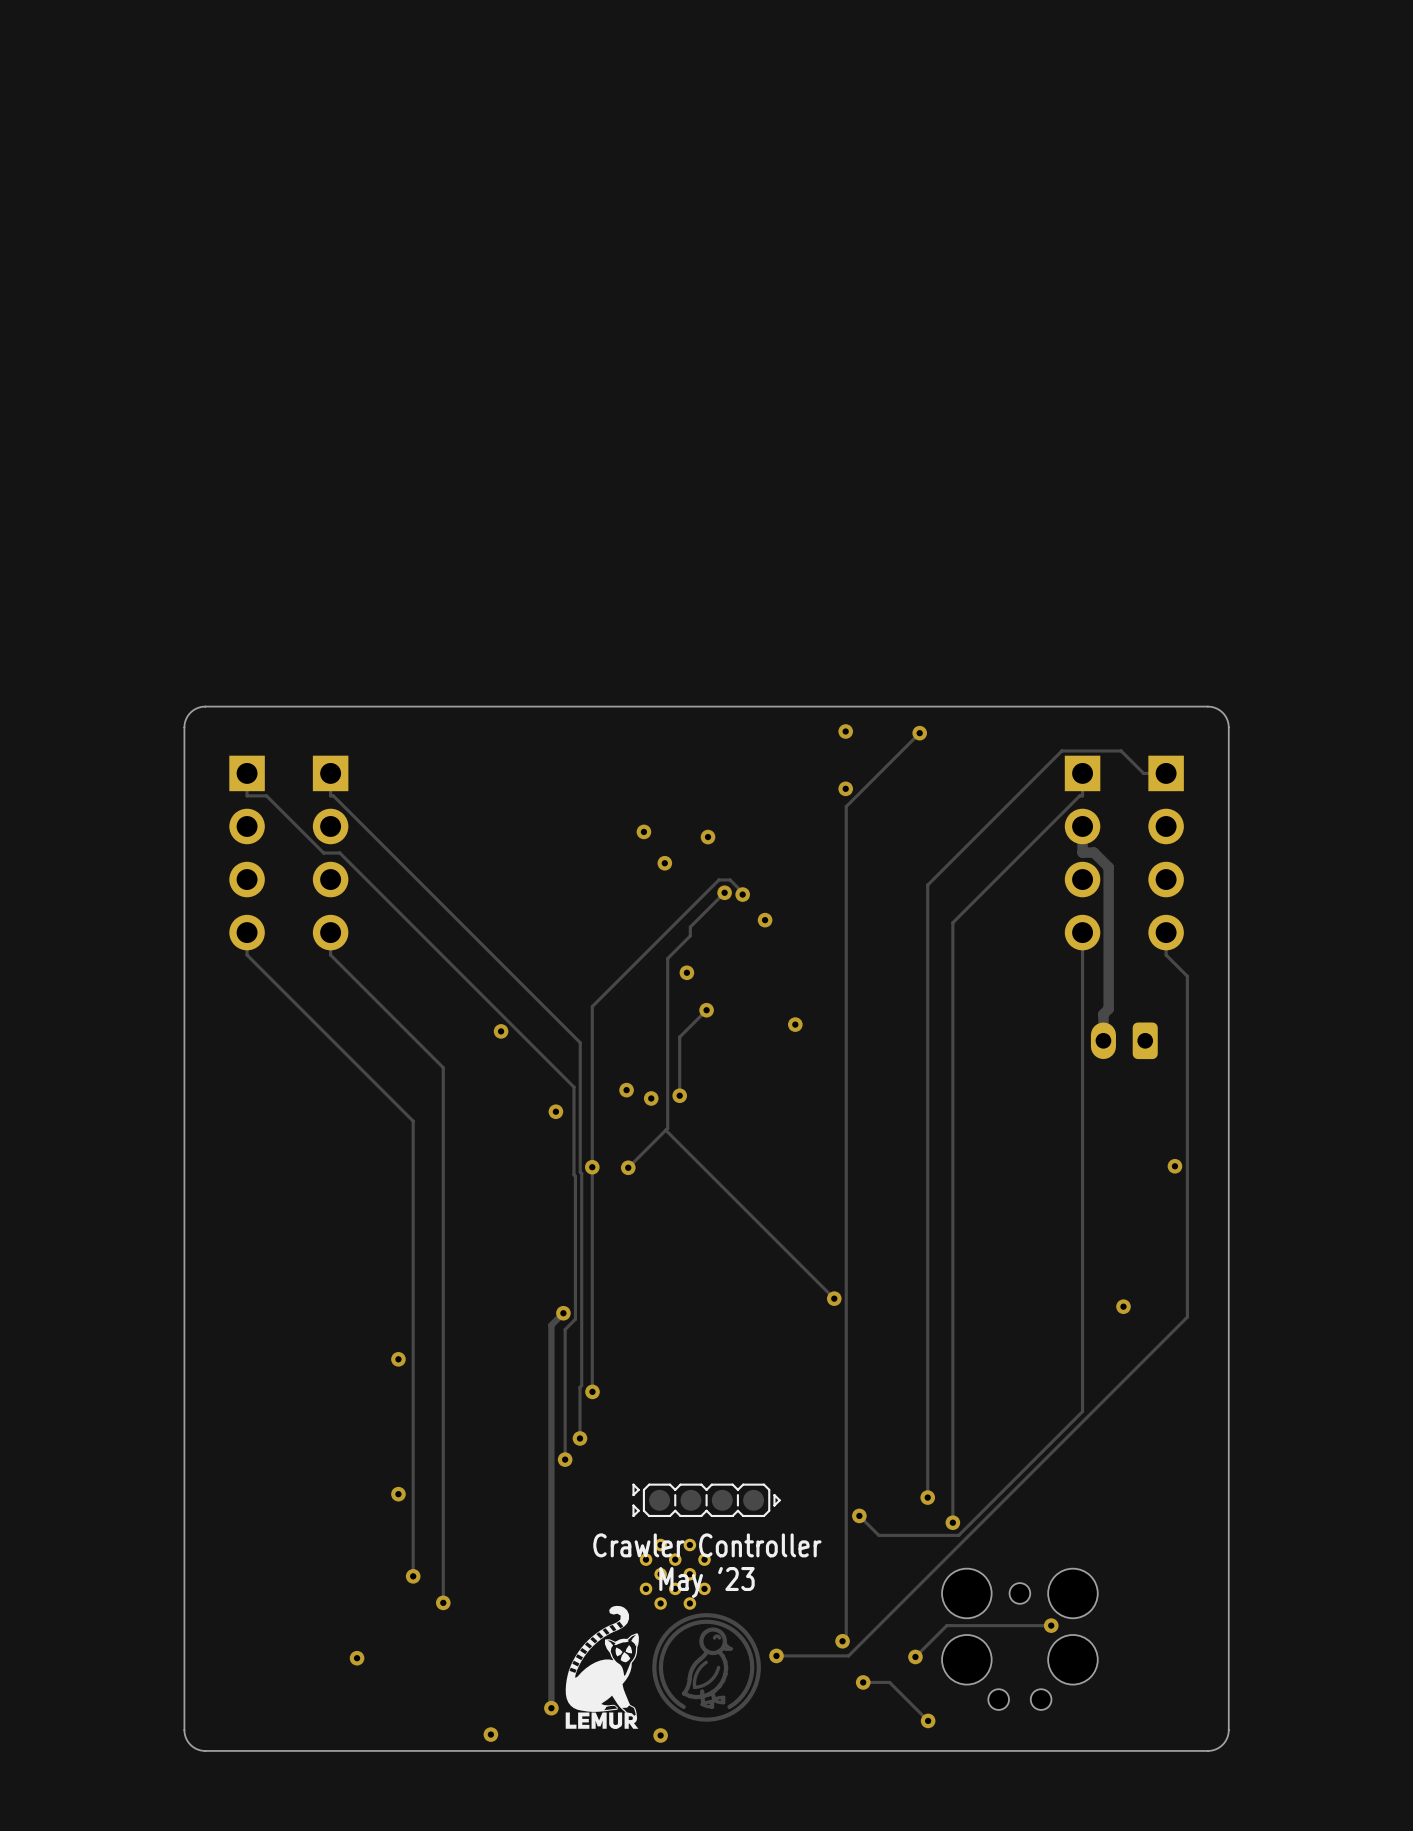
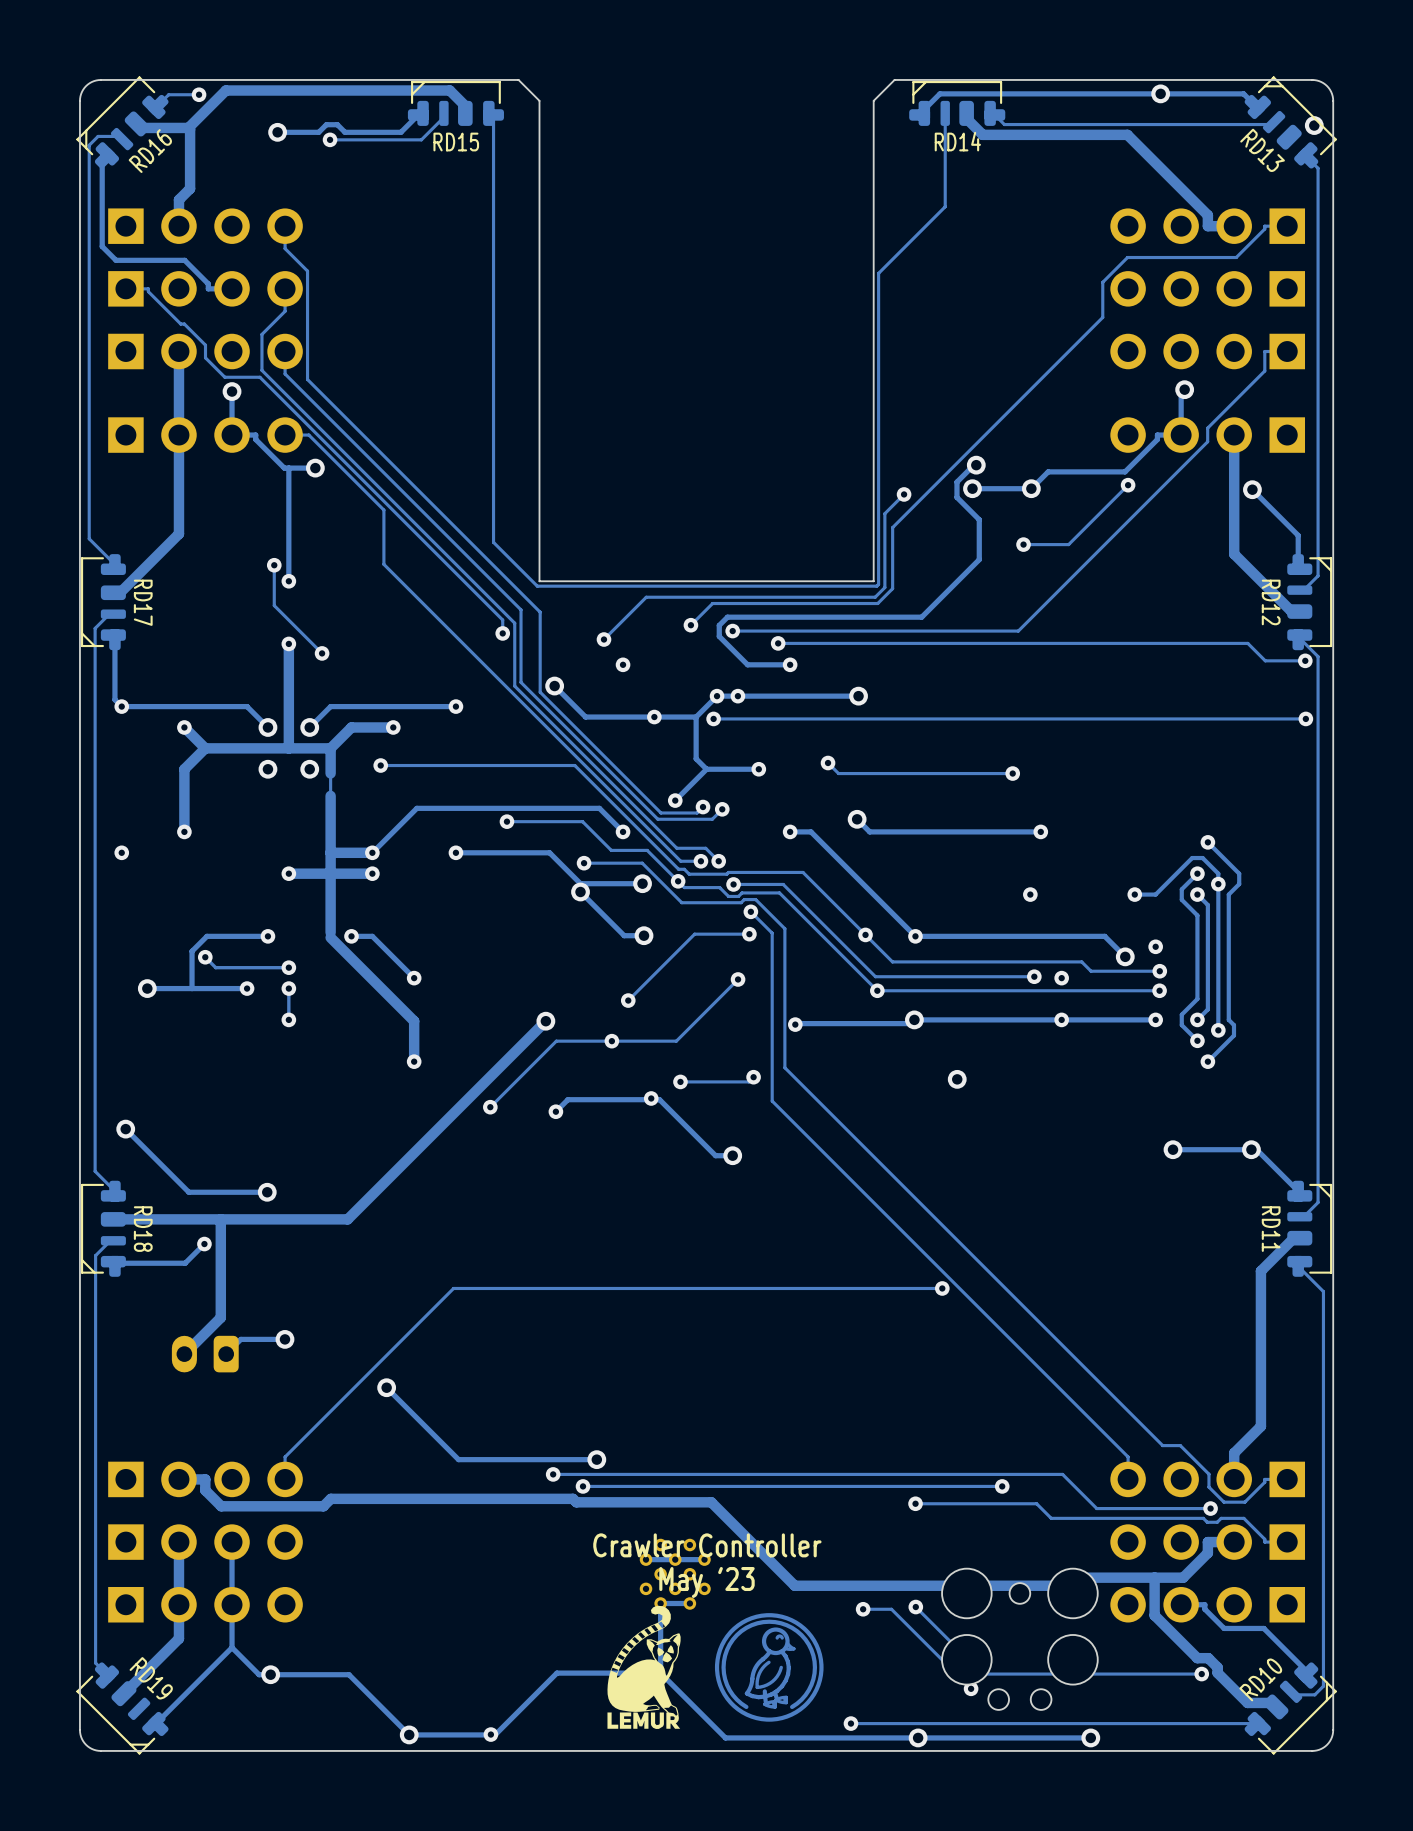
via: none -> (1160, 93)
track: none -> (199, 94) (168, 94) (158, 105)
via: none -> (199, 94)
RD15: none -> (455, 103)
RD14: none -> (957, 103)
track: none -> (1254, 105) (1243, 93) (939, 93) (924, 109)
track: none -> (465, 113) (465, 106) (449, 90) (225, 90) (188, 127)
track: none -> (945, 113) (945, 206) (878, 273) (878, 584) (876, 586) (537, 586) (493, 542) (493, 114)
track: none -> (418, 114) (400, 132) (345, 132) (337, 124) (326, 124) (318, 132) (277, 132)
track: none -> (994, 114) (1004, 124) (1271, 124)
track: none -> (443, 117) (421, 139) (330, 139)
track: none -> (966, 118) (982, 134) (1127, 134) (1207, 215) (1207, 226) (1234, 226)
RD16: none -> (122, 122)
RD13: none -> (1290, 122)
via: none -> (1314, 125)
track: none -> (188, 127) (141, 127)
track: none -> (188, 127) (190, 129) (190, 188) (178, 199) (178, 226)
via: none -> (277, 132)
track: none -> (119, 136) (98, 136) (89, 145) (89, 538) (114, 564)
via: none -> (330, 139)
track: none -> (1308, 158) (1318, 168) (1318, 575) (1303, 590)
track: none -> (102, 161) (102, 246) (116, 260) (184, 260) (208, 283) (208, 288) (232, 288)
part: none -> (205, 226)
track: none -> (285, 226) (285, 248) (307, 271) (307, 379) (540, 612) (540, 692) (661, 812) (697, 812) (703, 807)
part: none -> (1207, 226)
track: none -> (1287, 226) (1264, 226) (1264, 228) (1236, 257) (1127, 257) (1102, 282) (1102, 317) (892, 527) (892, 588) (877, 603) (712, 603) (690, 625)
track: none -> (125, 288) (148, 288) (148, 291) (180, 324) (184, 324) (205, 345) (205, 357) (224, 377) (259, 377) (502, 620) (502, 633)
part: none -> (205, 288)
track: none -> (285, 288) (285, 311) (261, 334) (261, 370) (514, 623) (514, 686) (676, 848) (705, 848) (718, 861)
part: none -> (1207, 288)
track: none -> (178, 351) (178, 533) (120, 592)
part: none -> (205, 351)
track: none -> (285, 351) (285, 373) (521, 609) (521, 682) (657, 819) (712, 819) (722, 809)
part: none -> (1207, 351)
track: none -> (1287, 351) (1264, 351) (1264, 370) (1207, 428) (1207, 441) (1018, 631) (732, 631)
track: none -> (1184, 389) (1181, 393) (1181, 435) (1157, 435) (1157, 439) (1125, 471) (1048, 471) (1031, 488) (972, 488)
via: none -> (1184, 389)
track: none -> (232, 391) (232, 435) (255, 435) (255, 439) (284, 468) (315, 468)
via: none -> (232, 391)
part: none -> (205, 435)
track: none -> (285, 435) (308, 435) (383, 510) (383, 564) (680, 861) (700, 861)
part: none -> (1207, 435)
track: none -> (1234, 435) (1234, 554) (1291, 611) (1299, 611)
track: none -> (976, 465) (973, 465) (956, 482) (956, 497) (979, 519) (979, 559) (921, 617) (727, 617) (719, 625) (719, 636) (747, 664) (790, 664)
via: none -> (976, 465)
track: none -> (288, 468) (288, 581)
via: none -> (315, 468)
track: none -> (1128, 485) (1068, 544) (1023, 544)
via: none -> (1128, 485)
via: none -> (972, 488)
via: none -> (1031, 488)
track: none -> (1252, 489) (1298, 535) (1298, 564)
via: none -> (1252, 489)
track: none -> (904, 494) (884, 513) (884, 587) (875, 597) (646, 597) (603, 639)
via: none -> (904, 494)
via: none -> (1023, 544)
track: none -> (274, 565) (274, 605) (322, 653)
via: none -> (274, 565)
via: none -> (288, 581)
RD17: none -> (103, 602)
RD12: none -> (1309, 602)
track: none -> (109, 614) (95, 628) (95, 1171) (114, 1191)
via: none -> (690, 625)
via: none -> (732, 631)
via: none -> (502, 633)
track: none -> (114, 639) (114, 699) (121, 706) (247, 706) (267, 727)
via: none -> (603, 639)
track: none -> (1301, 639) (1318, 656) (1318, 1202) (1303, 1216)
track: none -> (288, 643) (288, 748)
via: none -> (288, 643)
track: none -> (778, 643) (1247, 643) (1265, 660) (1305, 660)
via: none -> (778, 643)
via: none -> (322, 653)
via: none -> (1305, 660)
via: none -> (623, 664)
via: none -> (790, 664)
track: none -> (554, 686) (585, 717) (696, 717)
via: none -> (554, 686)
via: none -> (717, 696)
via: none -> (737, 696)
track: none -> (858, 696) (717, 696) (696, 717)
via: none -> (858, 696)
via: none -> (121, 706)
track: none -> (455, 706) (330, 706) (309, 727)
via: none -> (455, 706)
via: none -> (654, 717)
track: none -> (696, 717) (696, 758) (706, 769)
via: none -> (713, 718)
track: none -> (1305, 718) (713, 718)
via: none -> (1305, 718)
track: none -> (184, 727) (205, 748)
via: none -> (184, 727)
via: none -> (267, 727)
via: none -> (309, 727)
track: none -> (393, 727) (351, 727) (330, 748)
via: none -> (393, 727)
via: (845, 731) -> none
track: (919, 733) (846, 806) (846, 1637) (842, 1641) -> none
via: (919, 733) -> none
track: none -> (205, 748) (184, 769) (184, 831)
track: none -> (330, 748) (205, 748)
track: none -> (330, 748) (330, 773)
track: none -> (828, 763) (838, 773) (1012, 773)
via: none -> (828, 763)
track: none -> (380, 765) (574, 765) (678, 869) (684, 869) (689, 874) (803, 872) (892, 961) (1081, 961) (1091, 971) (1159, 971)
via: none -> (380, 765)
via: none -> (267, 769)
via: none -> (309, 769)
track: none -> (706, 769) (675, 800)
track: none -> (758, 769) (706, 769)
via: none -> (758, 769)
track: (247, 773) (247, 795) (266, 795) (323, 853) (339, 853) (574, 1087) (575, 1319) (565, 1329) (565, 1459) -> none
via: none -> (1012, 773)
track: (1082, 773) (1082, 795) (1079, 795) (952, 922) (952, 1522) -> none
track: (1166, 773) (1143, 773) (1121, 750) (1061, 750) (927, 885) (927, 1497) -> none
via: (845, 788) -> none
track: (330, 795) (333, 795) (580, 1042) (581, 1385) (579, 1387) (579, 1438) -> (330, 795) (330, 932)
via: none -> (675, 800)
via: none -> (703, 807)
via: none -> (722, 809)
track: none -> (857, 819) (869, 831) (1040, 831)
via: none -> (857, 819)
track: none -> (506, 821) (582, 821) (611, 850) (647, 850) (684, 887) (719, 887) (728, 896) (738, 896) (742, 892) (779, 892) (877, 990) (1159, 990)
via: none -> (506, 821)
track: (1082, 826) (1082, 852) (1093, 852) (1108, 867) (1108, 1008) (1103, 1014) (1103, 1040) -> none
via: none -> (184, 831)
track: none -> (623, 831) (599, 808) (416, 808) (372, 852) (330, 852)
via position: (643, 831) -> (623, 831)
track: none -> (790, 831) (811, 831) (915, 936) (1104, 936) (1125, 956)
via: none -> (790, 831)
via: none -> (1040, 831)
via: (708, 837) -> none
track: none -> (1207, 842) (1239, 873) (1239, 884) (1228, 894) (1228, 1019) (1233, 1025) (1233, 1035) (1207, 1061)
via: none -> (1207, 842)
via: none -> (121, 852)
via: none -> (372, 852)
track: none -> (455, 852) (549, 852) (580, 883)
via: none -> (455, 852)
part: (247, 853) -> none
part: (330, 853) -> none
part: (1082, 853) -> none
part: (1166, 853) -> none
via: none -> (700, 861)
via: none -> (718, 861)
track: none -> (584, 863) (642, 863) (681, 902) (741, 902) (744, 899) (755, 899) (784, 928) (784, 1067) (1162, 1445) (1180, 1445) (1208, 1474) (1208, 1487) (1224, 1502) (1244, 1502) (1264, 1482) (1264, 1479) (1287, 1479)
via: none -> (584, 863)
via: (664, 863) -> none
via: none -> (288, 873)
track: none -> (372, 873) (288, 873)
via: none -> (372, 873)
track: none -> (1197, 873) (1181, 889) (1181, 899) (1197, 915) (1197, 999) (1181, 1014) (1181, 1025) (1197, 1040)
via: none -> (1197, 873)
via: none -> (678, 881)
track: none -> (580, 883) (580, 891) (624, 935) (644, 935)
track: none -> (642, 883) (580, 883)
via: none -> (642, 883)
track: none -> (733, 884) (783, 884) (875, 976) (1034, 976)
via: none -> (733, 884)
via: none -> (1218, 884)
via: none -> (580, 891)
track: (724, 892) (690, 927) (690, 935) (667, 958) (667, 1128) (665, 1130) -> none
via: (724, 892) -> none
track: (742, 894) (730, 880) (718, 880) (592, 1006) (592, 1391) -> none
via: (742, 894) -> none
via: none -> (1030, 894)
track: none -> (1134, 894) (1155, 894) (1192, 858) (1202, 858) (1218, 873) (1218, 1030)
via: none -> (1134, 894)
track: none -> (1197, 894) (1207, 905) (1207, 1009) (1197, 1019)
via: none -> (1197, 894)
track: none -> (750, 911) (772, 933) (772, 1101) (1128, 1456) (1128, 1479)
via position: (765, 920) -> (750, 911)
track: (247, 932) (247, 955) (413, 1121) (413, 1576) -> none
track: (1082, 932) (1082, 1411) (958, 1535) (878, 1535) (859, 1515) -> none
track: (1166, 932) (1166, 955) (1187, 976) (1187, 1317) (848, 1655) (776, 1655) -> none
track: none -> (749, 934) (694, 934) (628, 1000)
via: none -> (749, 934)
via: none -> (865, 934)
via: none -> (644, 935)
track: none -> (267, 936) (206, 936) (192, 951) (192, 988)
via: none -> (267, 936)
track: none -> (351, 936) (372, 936) (414, 978)
via: none -> (351, 936)
via: none -> (915, 936)
track: (330, 937) (330, 955) (443, 1067) (443, 1602) -> (330, 937) (414, 1021) (414, 1061)
via: none -> (1155, 946)
via: none -> (1125, 956)
track: none -> (205, 957) (215, 967) (288, 967)
via: none -> (205, 957)
via: none -> (288, 967)
via: none -> (1159, 971)
via: (686, 972) -> none
via: none -> (1034, 976)
via: none -> (414, 978)
via: none -> (1061, 978)
track: none -> (738, 979) (676, 1041) (556, 1041) (490, 1107)
via: none -> (738, 979)
via: none -> (147, 988)
track: none -> (247, 988) (147, 988)
via: none -> (247, 988)
track: none -> (288, 988) (288, 1019)
via: none -> (288, 988)
via: none -> (877, 990)
via: none -> (1159, 990)
via: none -> (628, 1000)
track: (706, 1010) (679, 1037) (679, 1095) -> none
via: (706, 1010) -> none
via: none -> (288, 1019)
via: none -> (914, 1019)
via: none -> (1061, 1019)
track: none -> (1155, 1019) (914, 1019) (910, 1023) (800, 1023)
via: none -> (1155, 1019)
via: none -> (1197, 1019)
track: none -> (545, 1021) (347, 1219) (113, 1219)
via: none -> (545, 1021)
via: none -> (1218, 1030)
via: (501, 1031) -> none
part: (1124, 1040) -> none
via: none -> (1197, 1040)
via: none -> (611, 1041)
via: none -> (414, 1061)
via: none -> (1207, 1061)
track: none -> (753, 1077) (748, 1081) (680, 1081)
via: none -> (753, 1077)
via: none -> (957, 1079)
via: (626, 1090) -> none
via position: (679, 1095) -> (680, 1081)
via: none -> (490, 1107)
track: none -> (555, 1111) (567, 1099) (659, 1099) (715, 1155) (732, 1155)
track: none -> (125, 1129) (188, 1192) (267, 1192)
via: none -> (125, 1129)
track: (665, 1130) (628, 1167) -> none
track: (665, 1130) (834, 1298) -> none
track: none -> (1173, 1149) (1256, 1149) (1298, 1191)
via: none -> (1251, 1149)
via: none -> (732, 1155)
via position: (1174, 1166) -> (1173, 1149)
via: (592, 1167) -> none
via: (628, 1167) -> none
via: none -> (267, 1192)
track: none -> (220, 1219) (220, 1317) (184, 1354)
RD18: none -> (103, 1228)
RD11: none -> (1309, 1228)
track: none -> (1293, 1238) (1260, 1271) (1260, 1426) (1234, 1453) (1234, 1479)
track: none -> (110, 1240) (95, 1255) (95, 1663) (105, 1672)
track: none -> (204, 1244) (185, 1263) (114, 1263)
via: none -> (204, 1244)
track: none -> (1298, 1266) (1323, 1291) (1323, 1686) (1314, 1694) (1294, 1694)
track: none -> (942, 1288) (453, 1288) (285, 1456) (285, 1479)
via: none -> (942, 1288)
via: (834, 1298) -> none
via: (1123, 1306) -> none
track: (563, 1313) (551, 1325) (551, 1708) -> none
via: (563, 1313) -> none
track: none -> (284, 1339) (240, 1339) (226, 1354)
via: none -> (284, 1339)
part: none -> (205, 1354)
via: (398, 1359) -> none
track: none -> (386, 1387) (458, 1459) (596, 1459)
via: none -> (386, 1387)
via: (592, 1391) -> none
via: (579, 1438) -> none
via: (565, 1459) -> none
via: none -> (596, 1459)
track: none -> (553, 1474) (1062, 1474) (1096, 1508) (1210, 1508)
via: none -> (553, 1474)
track: none -> (178, 1479) (205, 1479) (205, 1490) (221, 1506) (323, 1506) (330, 1498) (572, 1498) (576, 1502) (711, 1502) (794, 1585) (1056, 1585) (1064, 1577) (1183, 1577) (1207, 1552) (1207, 1542) (1234, 1542)
part: none -> (205, 1479)
part: none -> (1207, 1479)
drawing: [632, 1483, 781, 1518] -> none
via: none -> (583, 1486)
track: none -> (1002, 1486) (583, 1486)
via: none -> (1002, 1486)
via: (398, 1494) -> none
via position: (927, 1497) -> (915, 1503)
track: none -> (915, 1503) (1036, 1503) (1051, 1518) (1203, 1518) (1207, 1522) (1217, 1522) (1221, 1518) (1243, 1518) (1264, 1539) (1264, 1542) (1287, 1542)
via: none -> (1210, 1508)
via: (859, 1515) -> none
via: (952, 1522) -> none
track: none -> (178, 1542) (178, 1638) (123, 1693)
part: none -> (205, 1542)
track: none -> (232, 1542) (232, 1647)
part: none -> (1207, 1542)
track: none -> (704, 1559) (646, 1559)
via: (413, 1576) -> none
track: none -> (1154, 1577) (1154, 1615) (1197, 1658) (1208, 1658) (1217, 1667) (1217, 1672) (1247, 1702) (1271, 1702)
via: (443, 1602) -> none
track: none -> (689, 1603) (660, 1603) (660, 1673)
part: none -> (205, 1604)
track: none -> (1181, 1604) (1204, 1604) (1204, 1609) (1224, 1628) (1263, 1628) (1308, 1672)
part: none -> (1207, 1604)
track: none -> (915, 1607) (982, 1674) (1201, 1674)
via: none -> (915, 1607)
track: none -> (863, 1609) (891, 1609) (971, 1688)
via: none -> (863, 1609)
track: (1051, 1625) (946, 1625) (915, 1656) -> none
via: (1051, 1625) -> none
via: (842, 1641) -> none
track: none -> (232, 1647) (259, 1674) (349, 1674) (409, 1734) (495, 1734) (556, 1673) (660, 1673)
track: none -> (232, 1647) (156, 1723)
via: (776, 1655) -> none
via: (915, 1656) -> none
via: (357, 1658) -> none
drawing position: (602, 1667) -> (644, 1667)
drawing position: (706, 1667) -> (769, 1667)
track: none -> (660, 1673) (725, 1737) (1090, 1737)
via: none -> (270, 1674)
via: none -> (1201, 1674)
track: (863, 1682) (889, 1682) (928, 1720) -> none
via: (863, 1682) -> none
via: none -> (971, 1688)
RD19: none -> (122, 1708)
via: (551, 1708) -> none
RD10: none -> (1290, 1708)
via: (928, 1720) -> none
via: none -> (850, 1723)
track: none -> (1257, 1723) (850, 1723)
via: none -> (409, 1734)
via: (660, 1735) -> none
via: none -> (918, 1737)
via: none -> (1090, 1737)
board edge: (1207, 1750) (1214, 1749) (1222, 1744) (1226, 1739) (1228, 1730) (1228, 727) (1227, 720) (1222, 712) (1214, 707) (1207, 706) (205, 706) (198, 707) (190, 712) (186, 718) (184, 727) (184, 1730) (186, 1739) (190, 1744) (196, 1748) (205, 1750) -> (1207, 1750) (1314, 1750) (1327, 1744) (1333, 1732) (1333, 100) (1330, 89) (1323, 83) (1312, 79) (894, 79) (873, 100) (873, 581) (539, 581) (539, 100) (518, 79) (98, 80) (86, 86) (82, 91) (79, 100) (80, 1732) (86, 1744) (98, 1750) (205, 1750)

